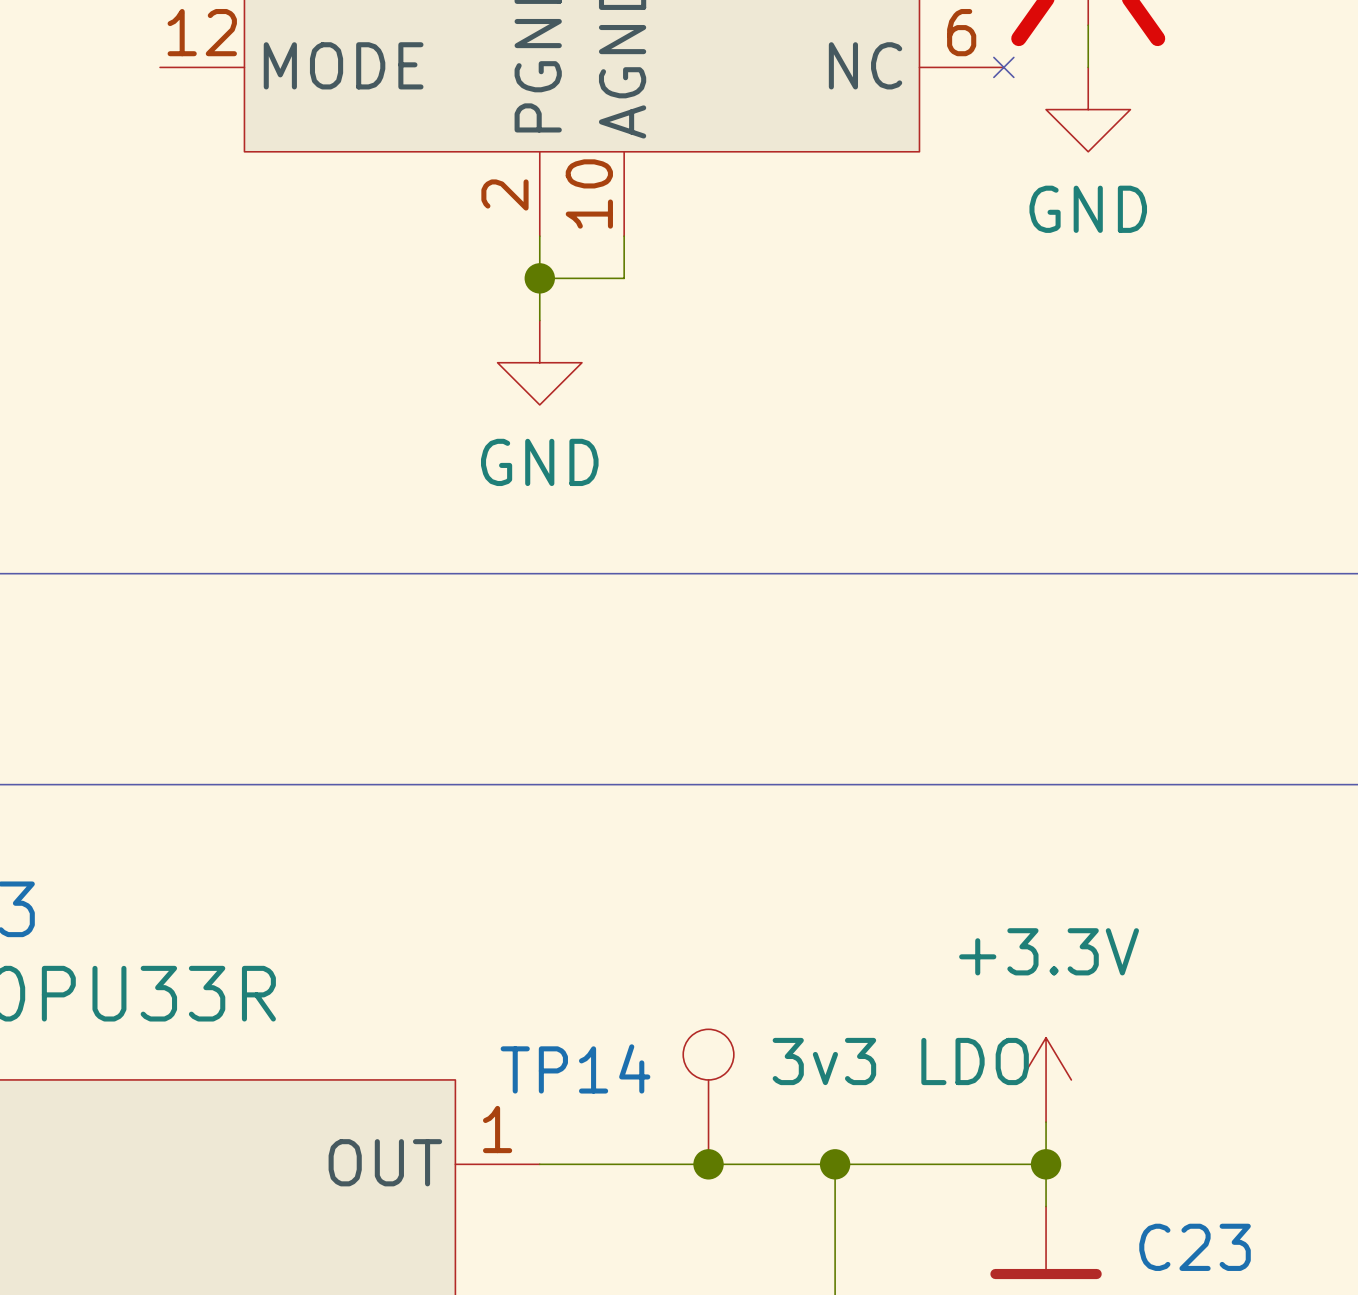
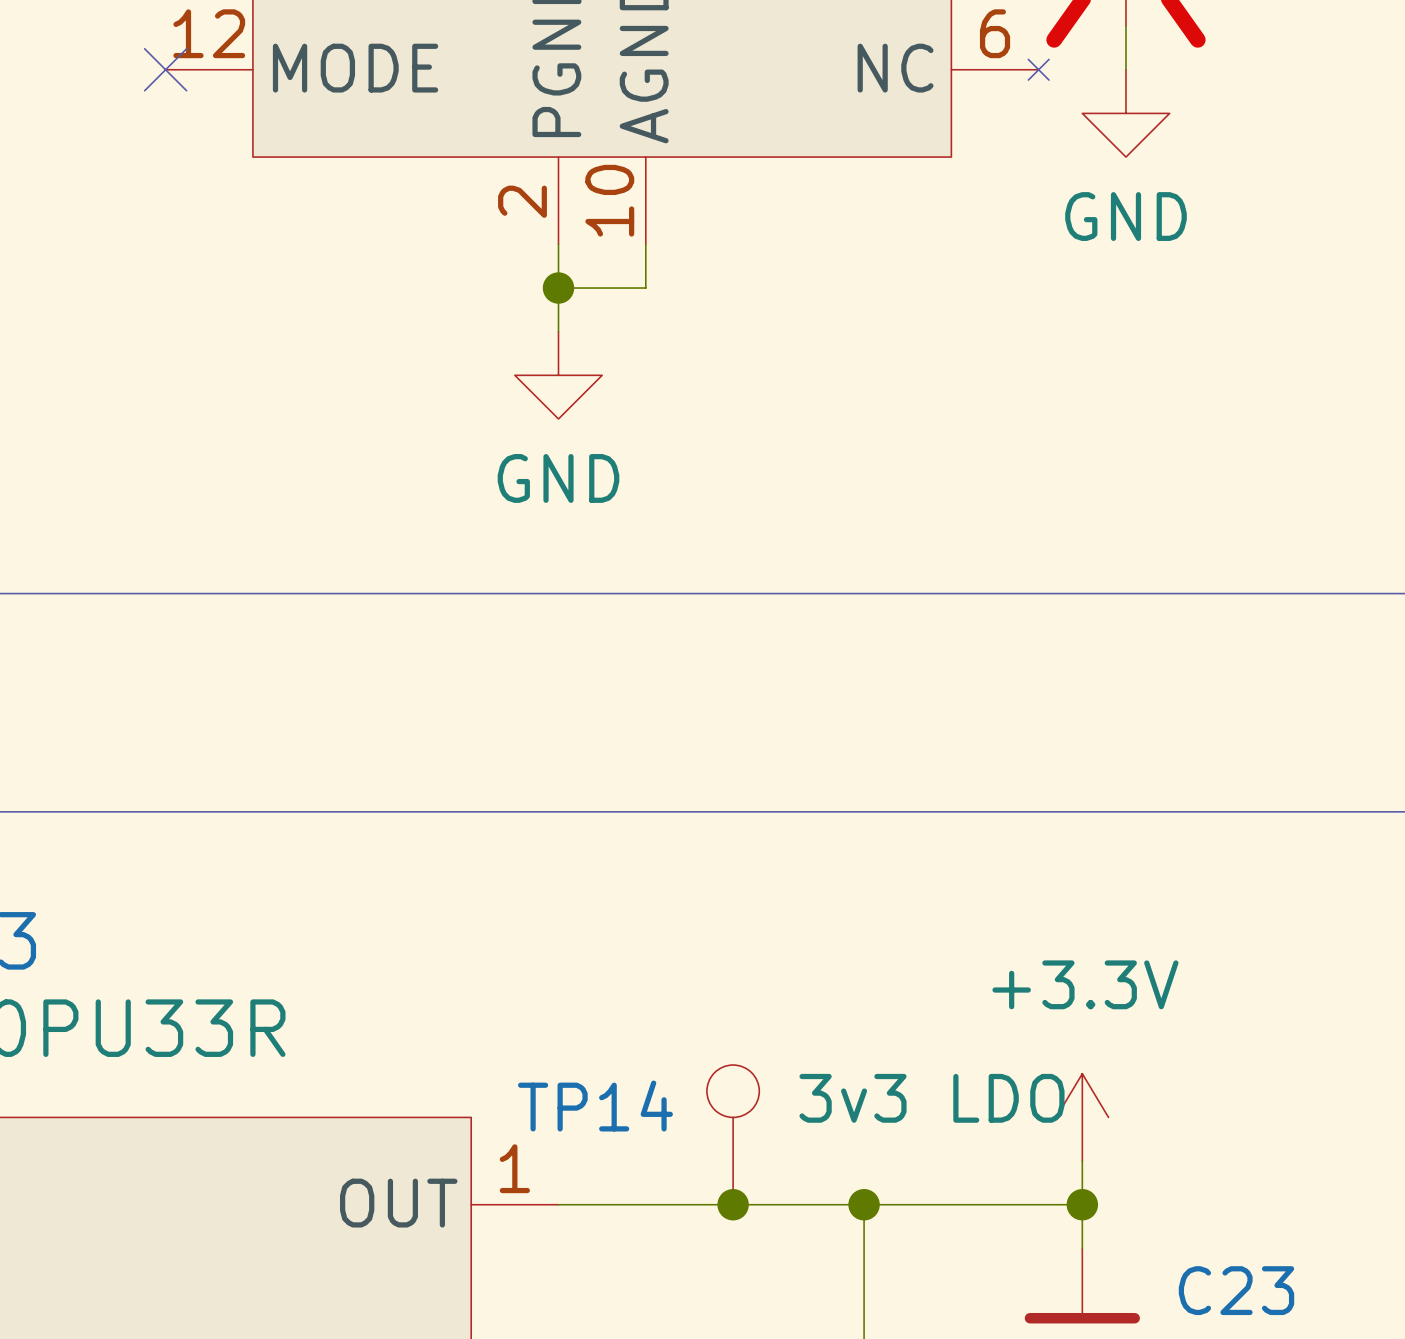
no-connect mark: none -> (165, 69)

